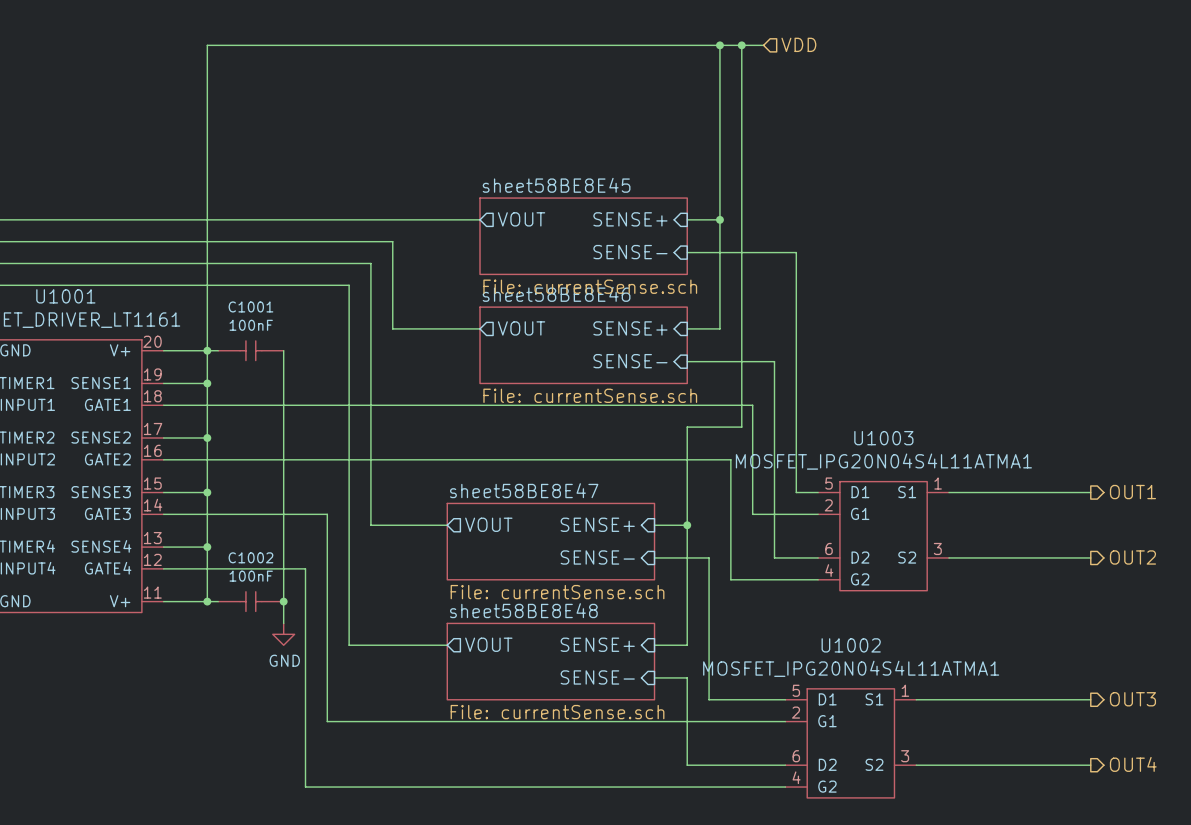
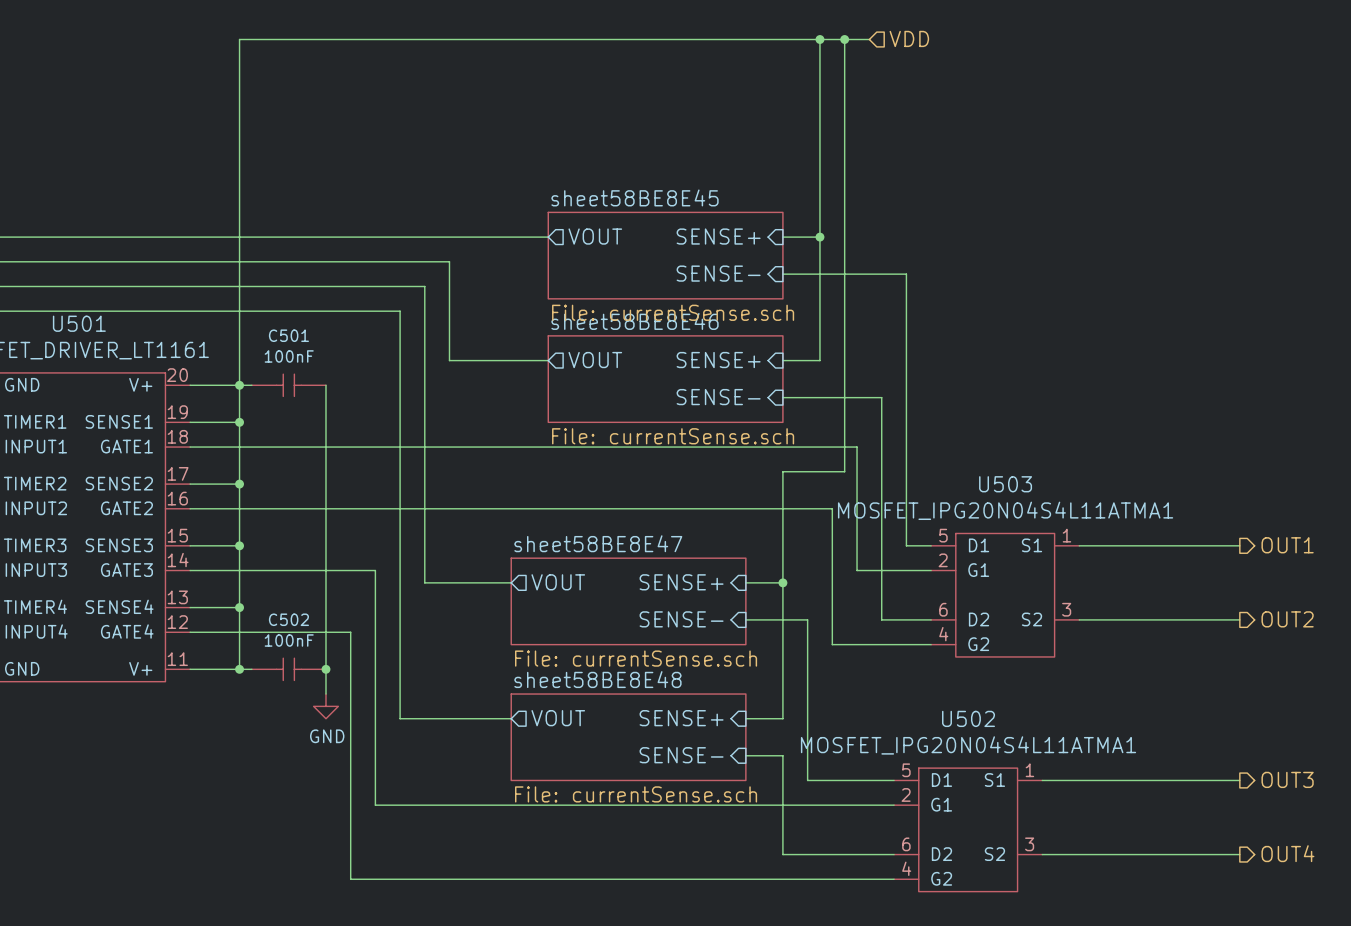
U1001 name: U1001 (65, 296) -> U501 (79, 323)
C1001 name: C1001 (250, 306) -> C501 (288, 335)
U1003 name: U1003 (883, 438) -> U503 (1005, 484)
C1002 name: C1002 (250, 557) -> C502 (288, 619)
U1002 name: U1002 (851, 645) -> U502 (968, 718)

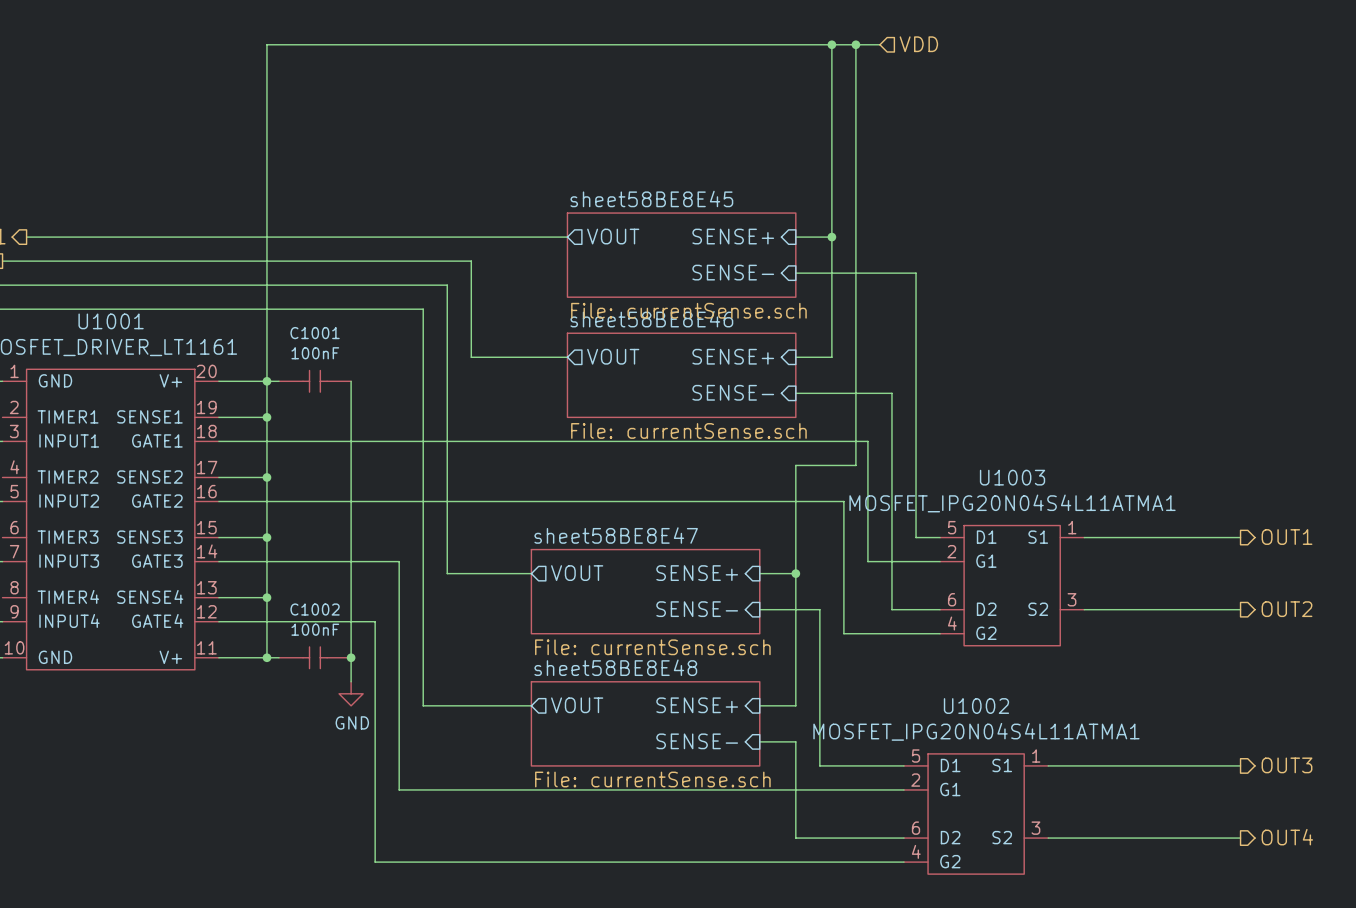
U501 name: U501 (79, 323) -> U1001 (111, 321)
C501 name: C501 (288, 335) -> C1001 (315, 333)
U503 name: U503 (1005, 484) -> U1003 (1012, 477)
C502 name: C502 (288, 619) -> C1002 (315, 609)
U502 name: U502 (968, 718) -> U1002 (976, 706)

